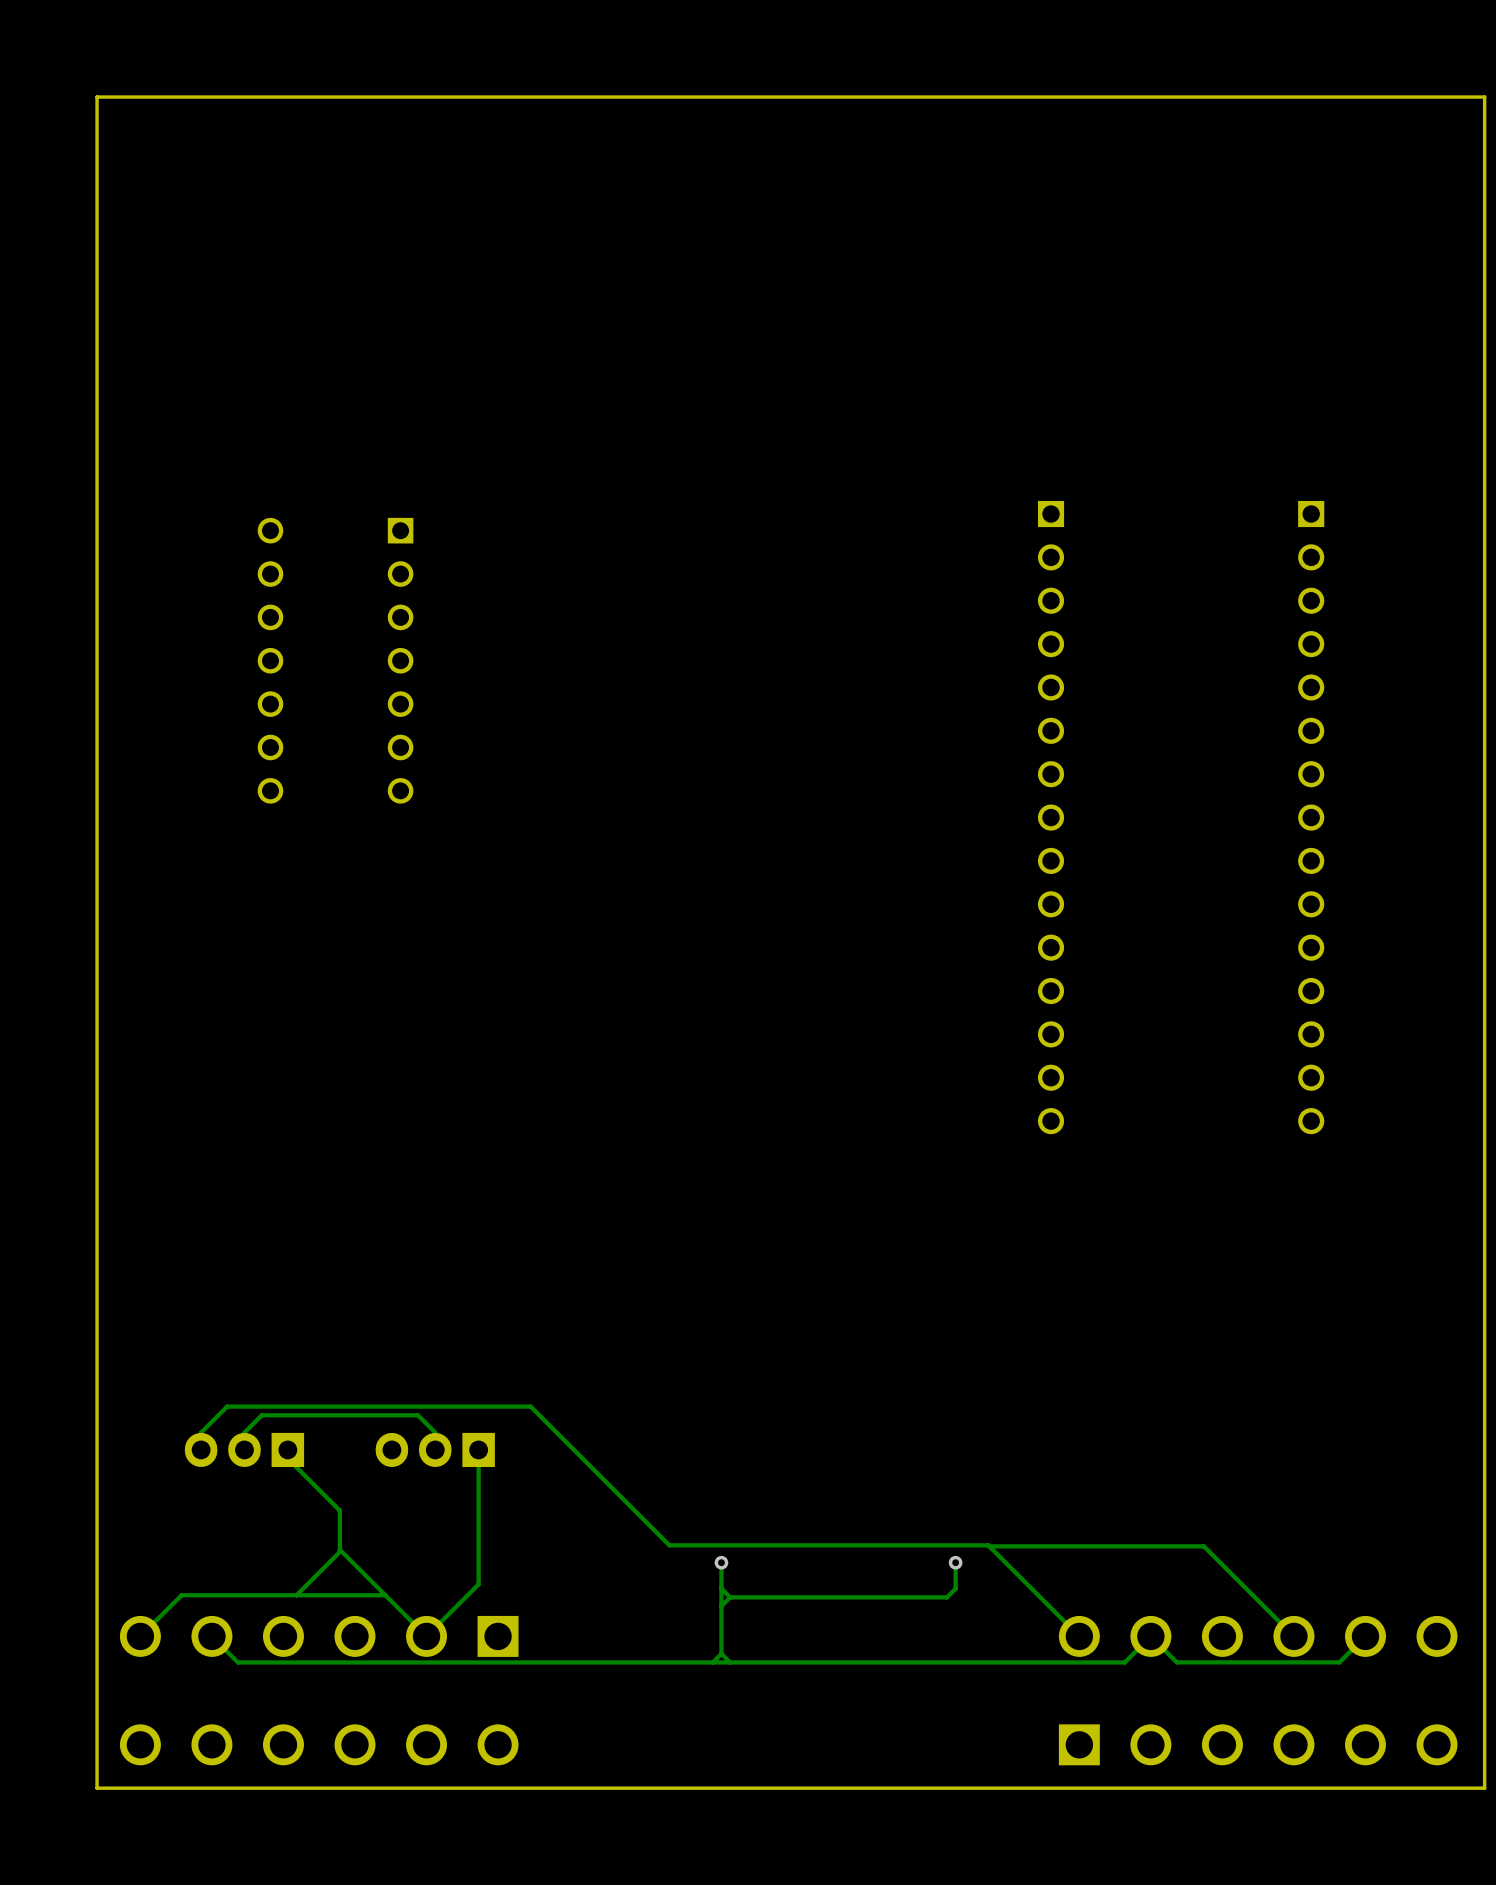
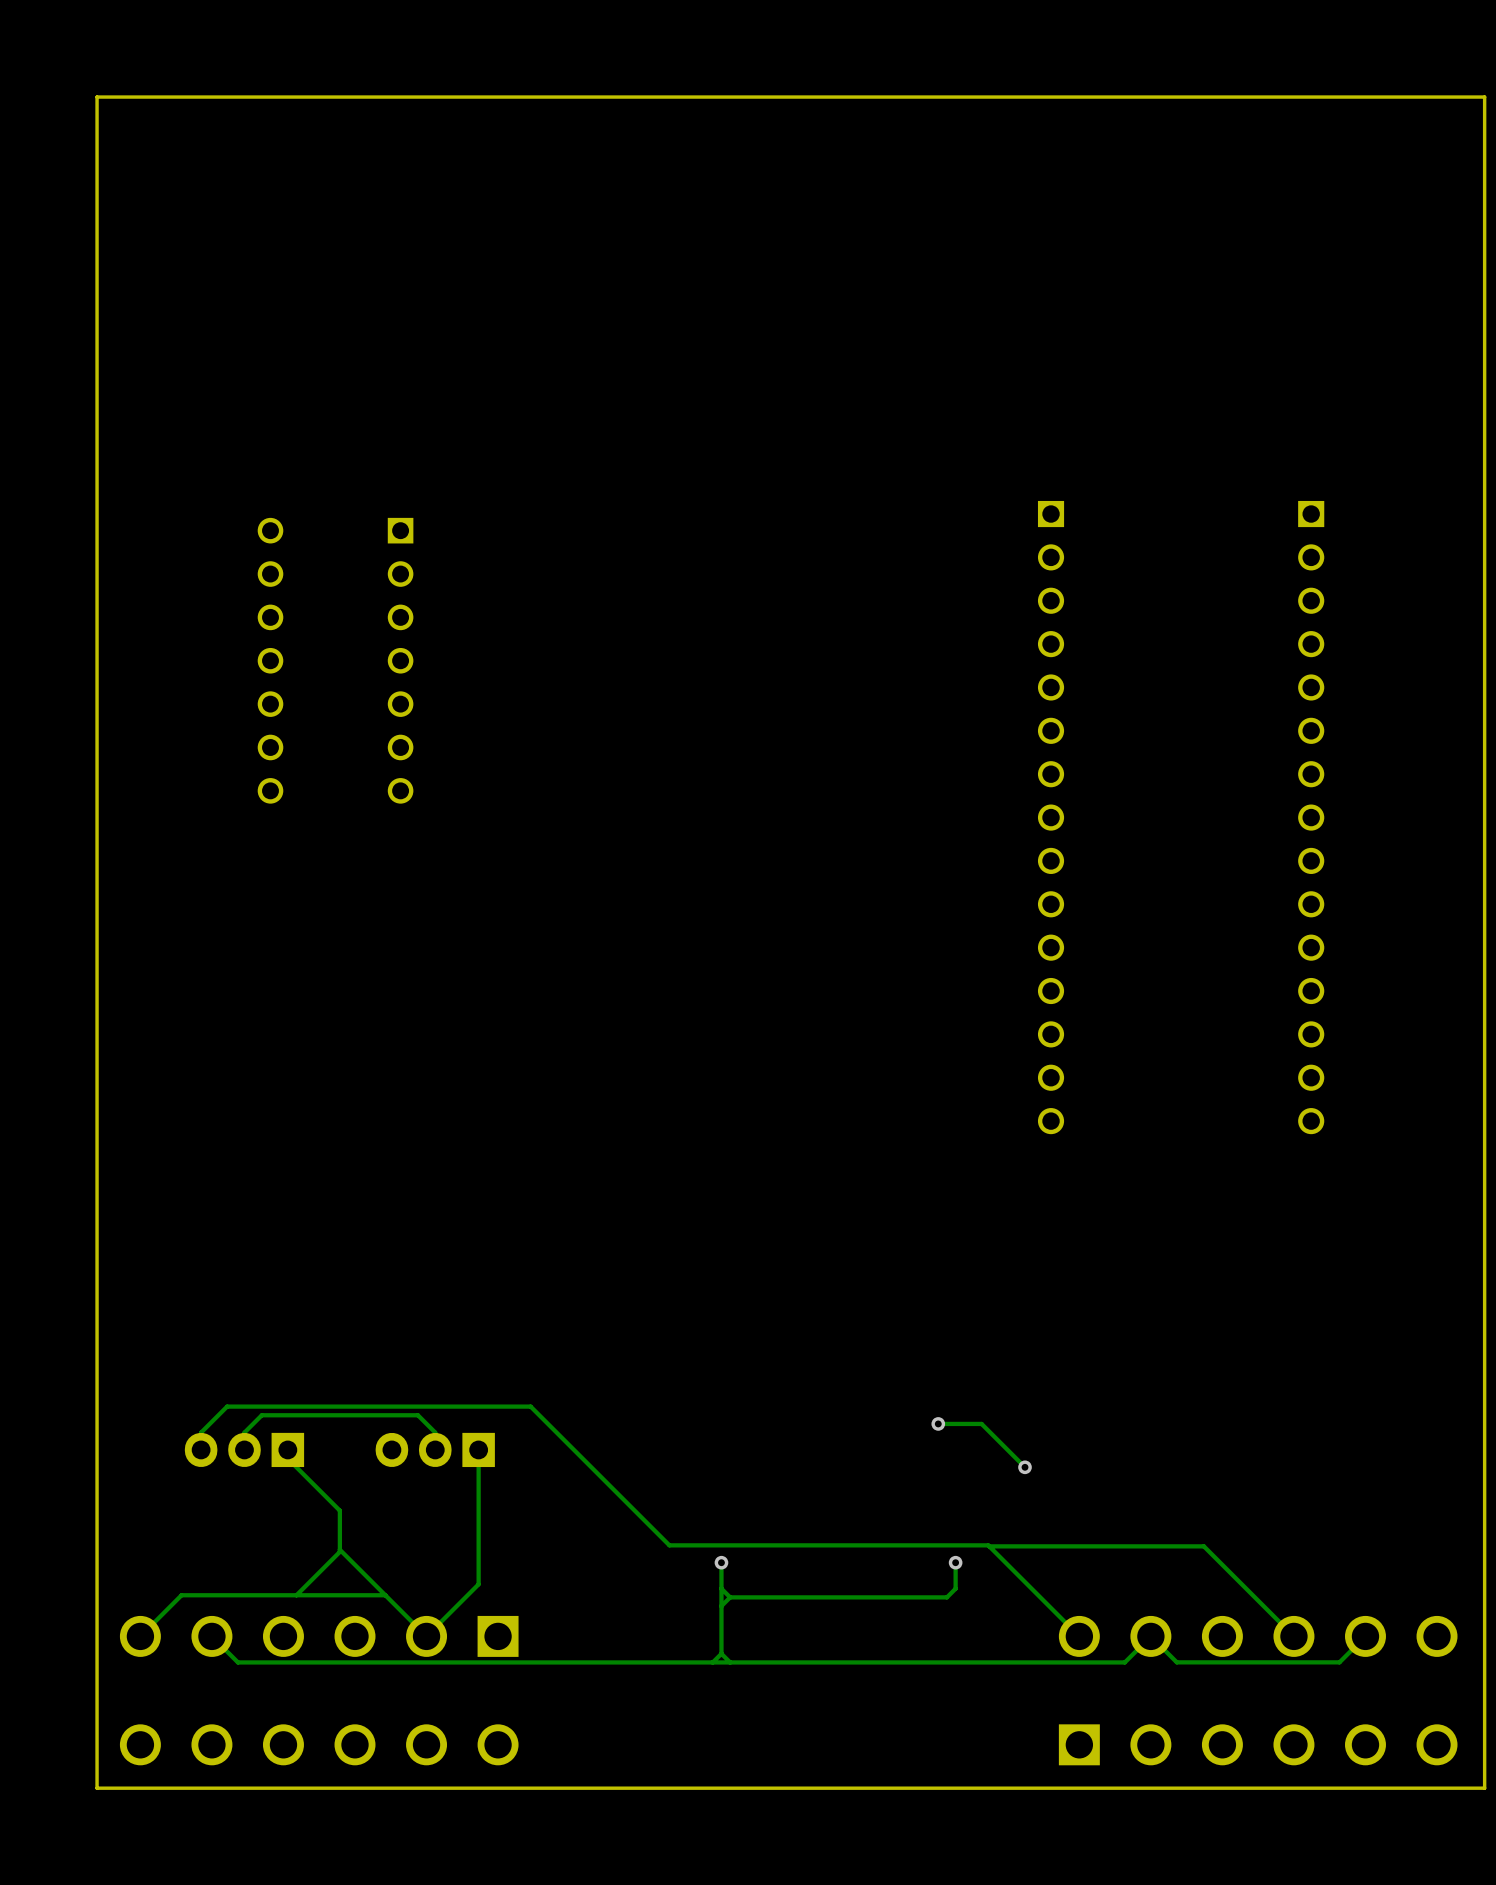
track: none -> (938, 1423) (981, 1423) (1025, 1467)
via: none -> (938, 1423)
via: none -> (1025, 1467)

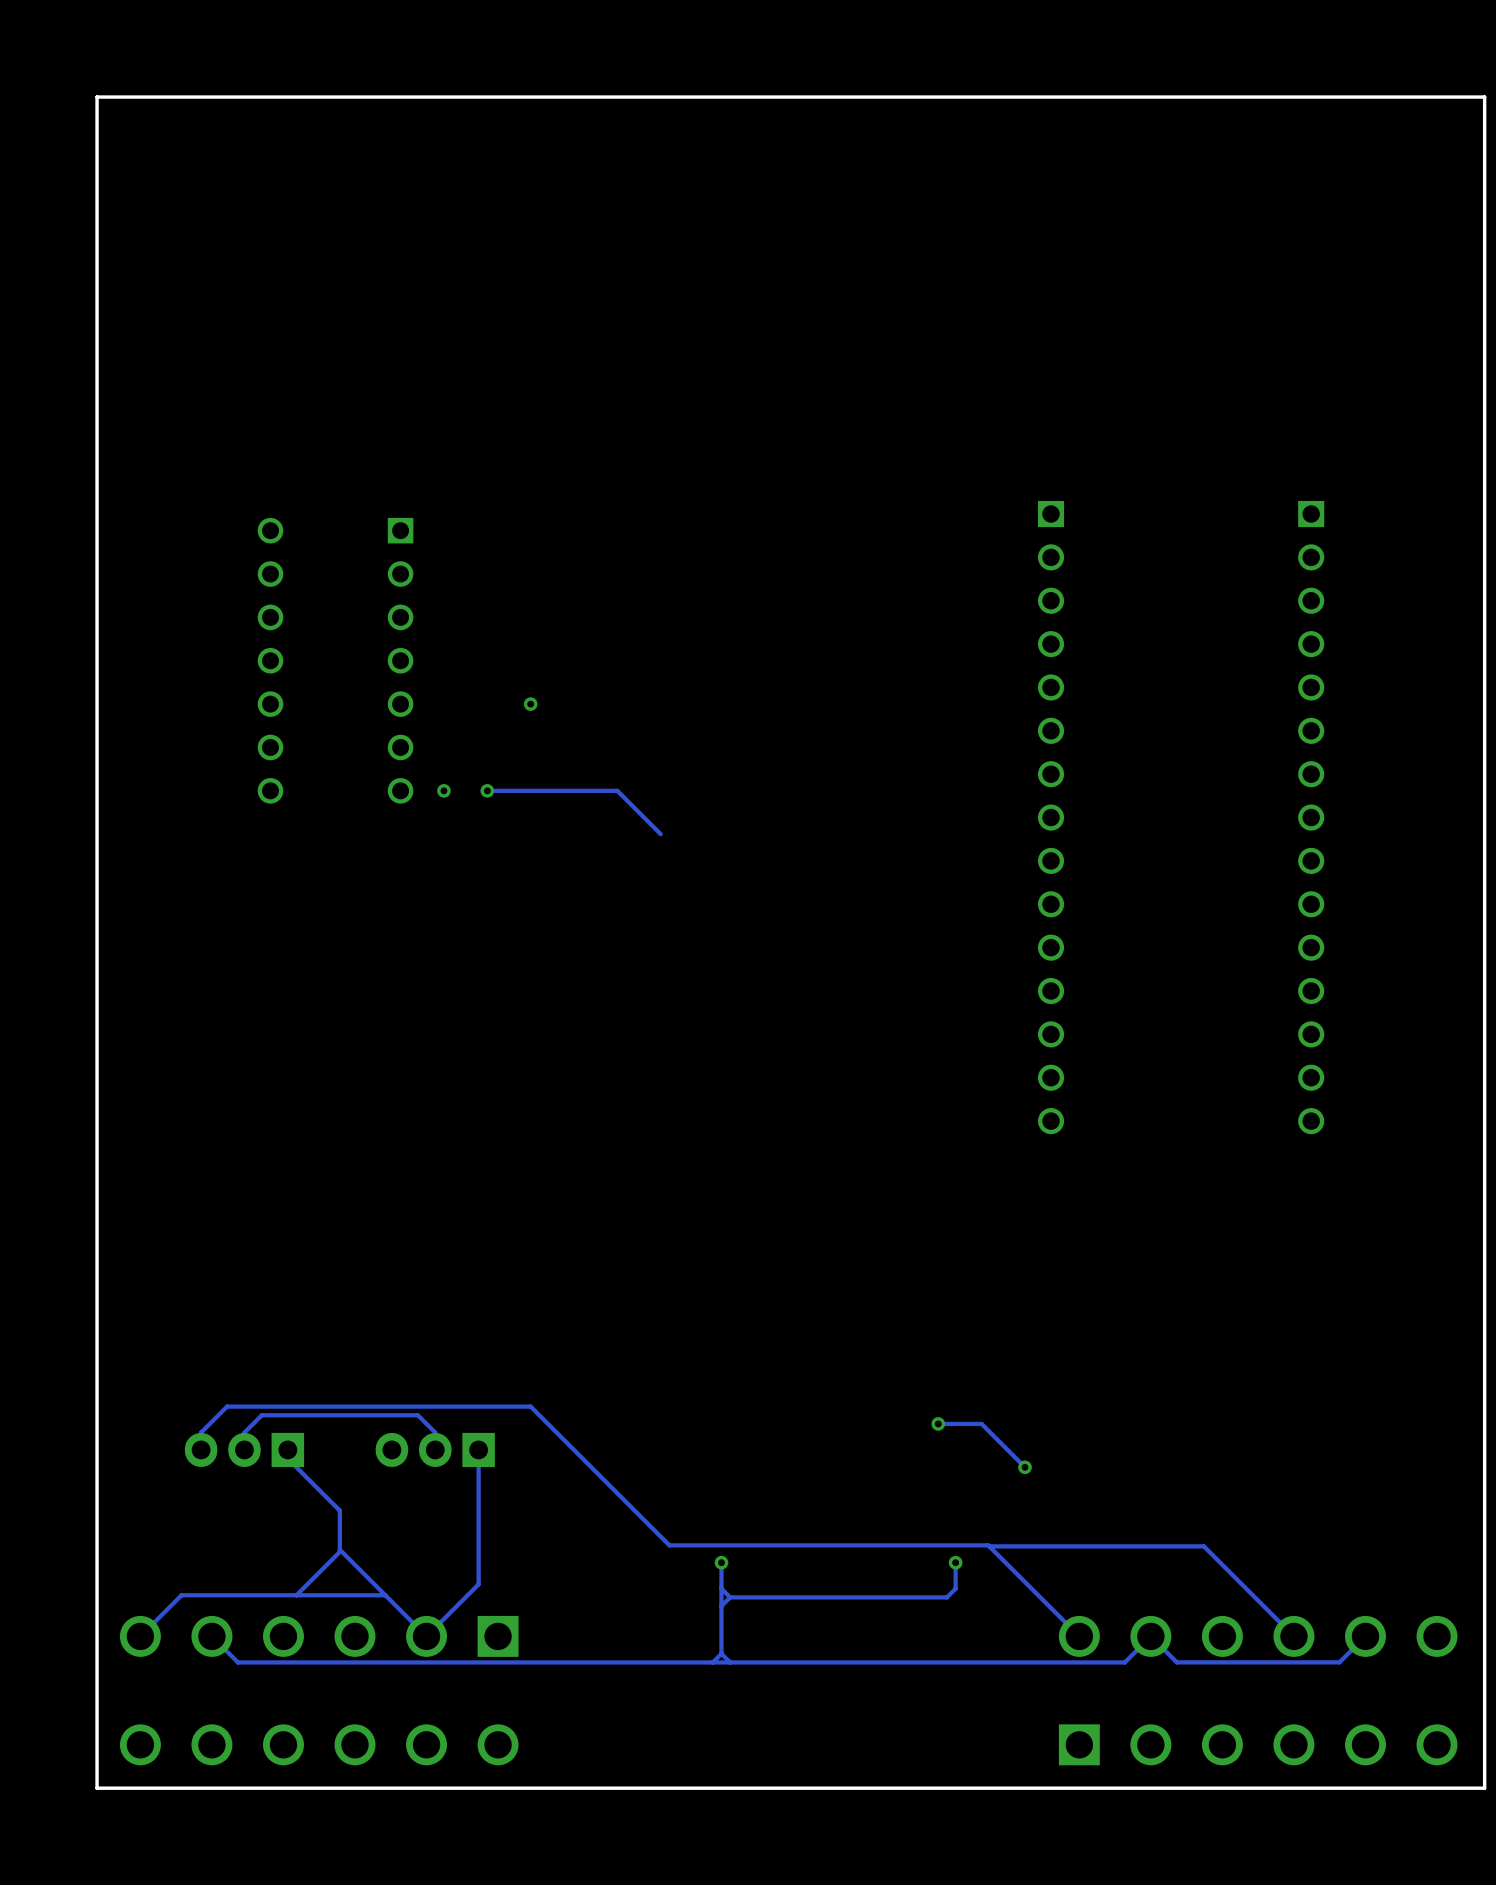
via: none -> (530, 704)
via: none -> (443, 790)
track: none -> (487, 790) (617, 790) (660, 834)
via: none -> (487, 790)

